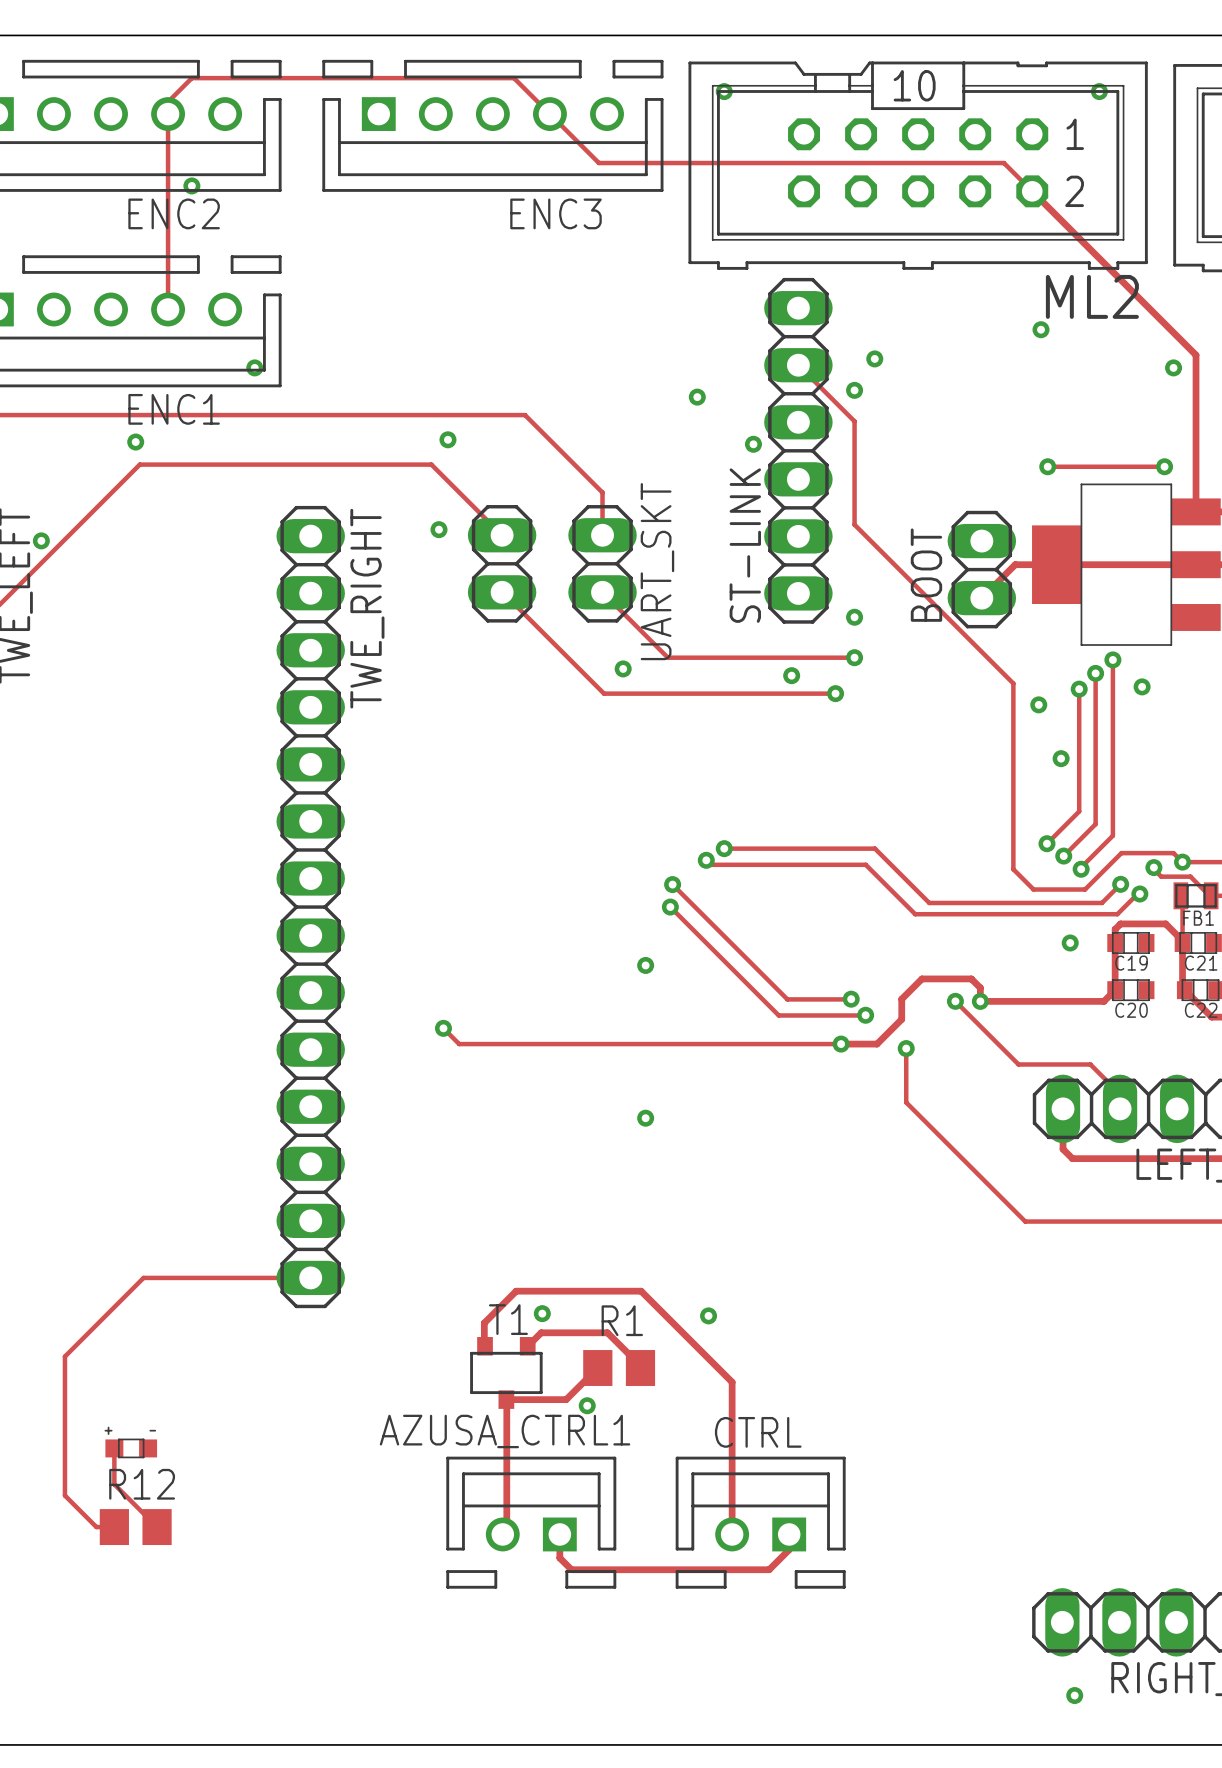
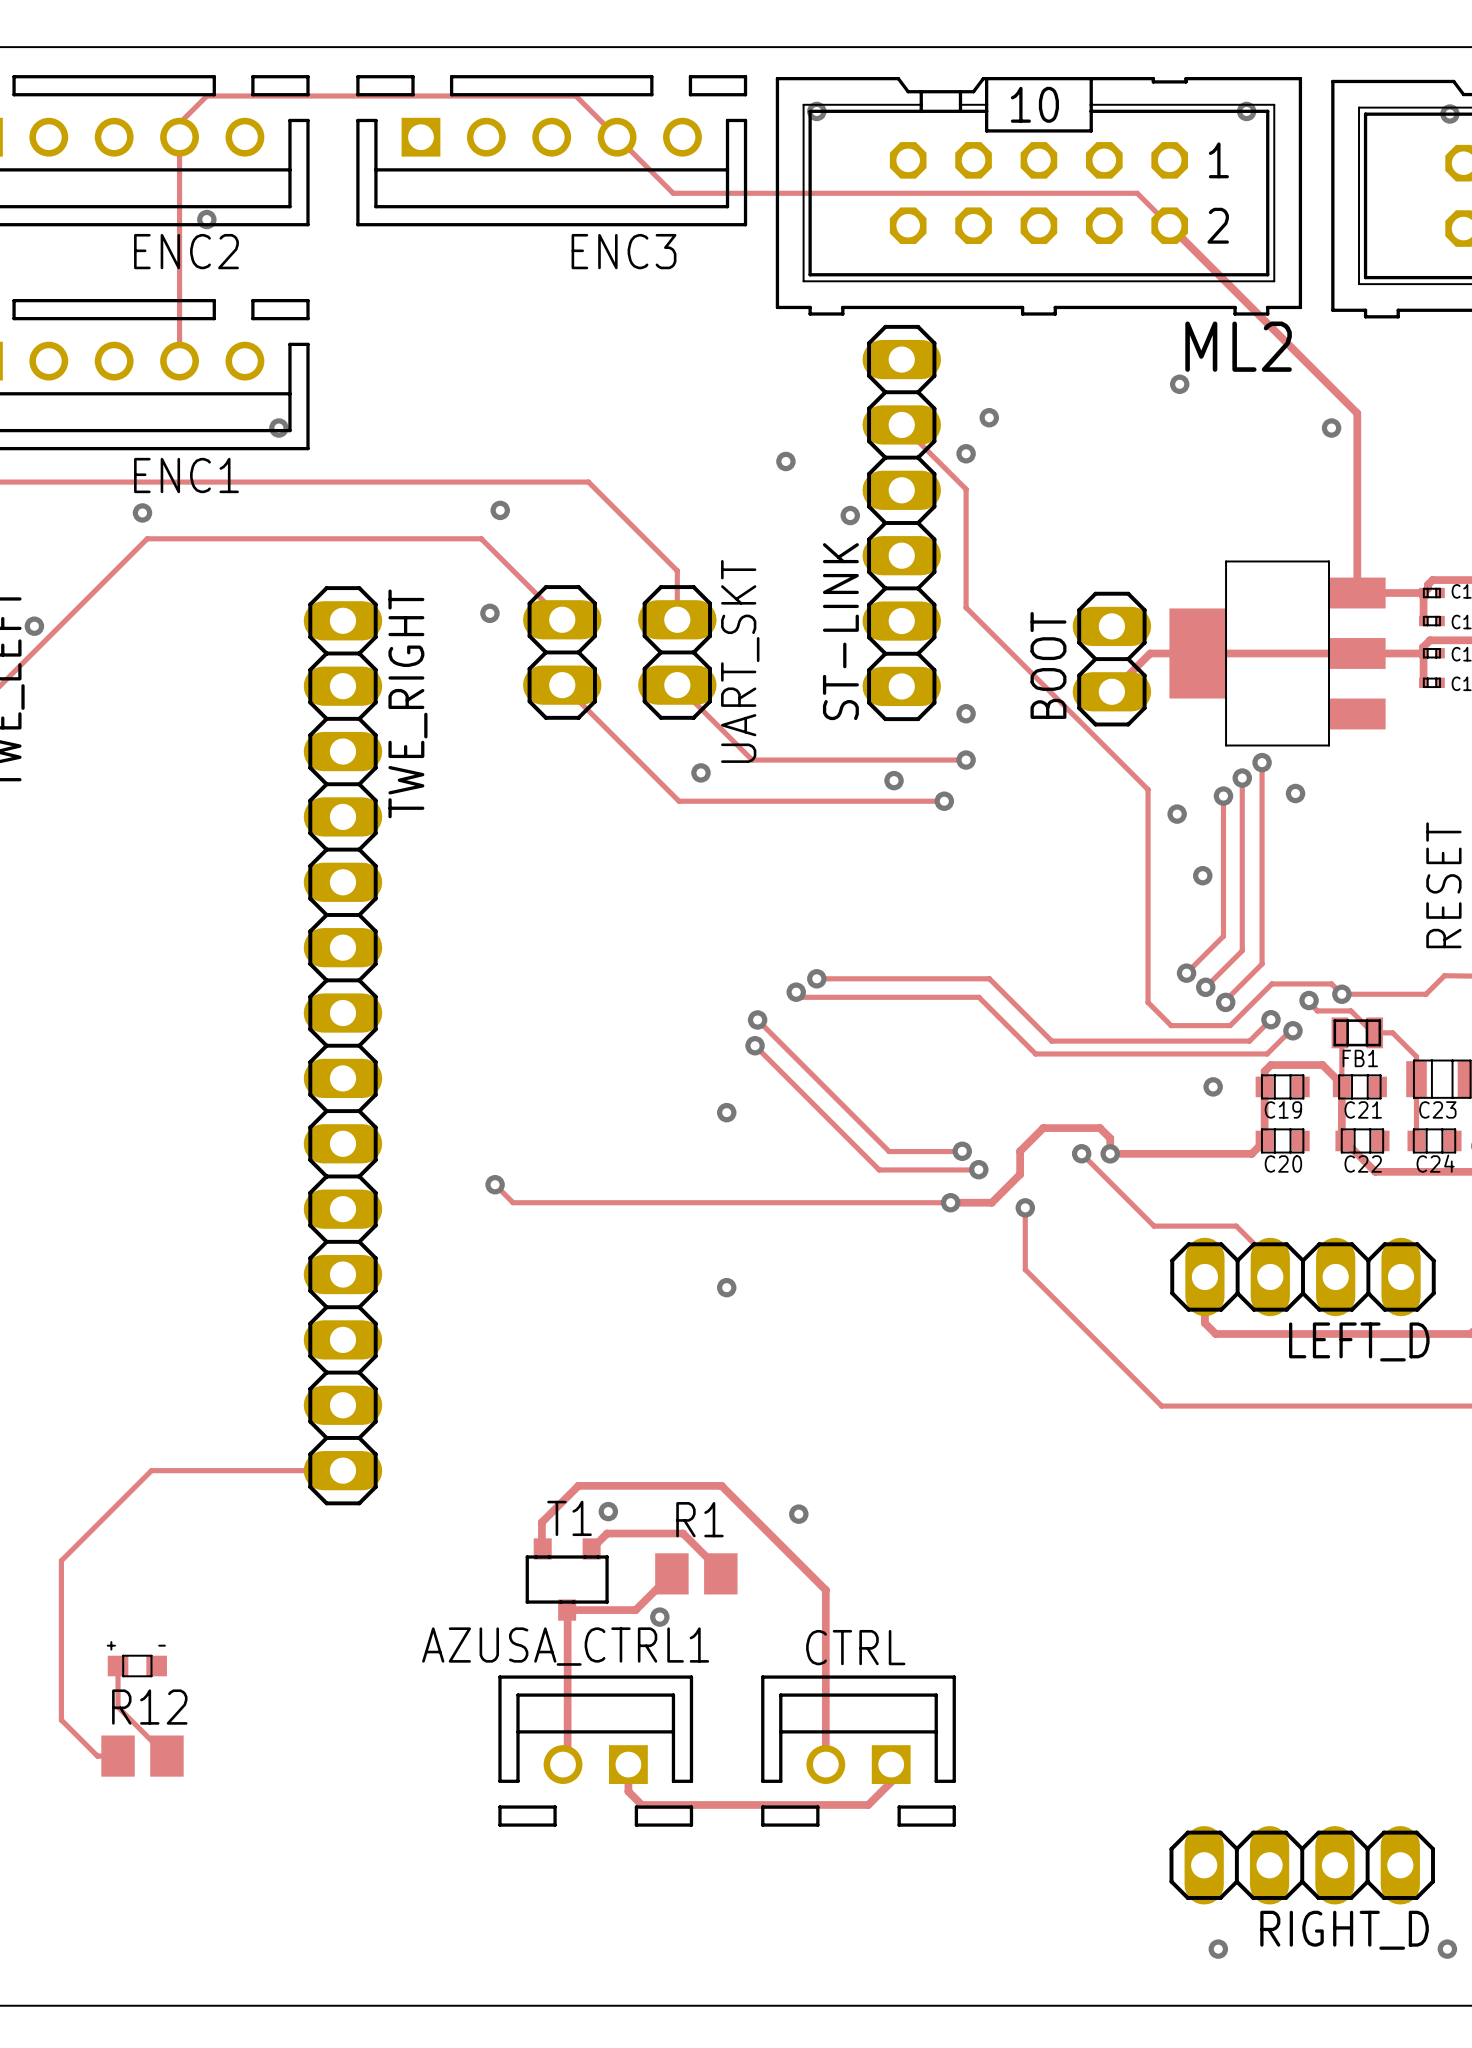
track: (1047, 466) (1164, 466) -> none
via: (1047, 466) -> none
via: (1164, 466) -> none

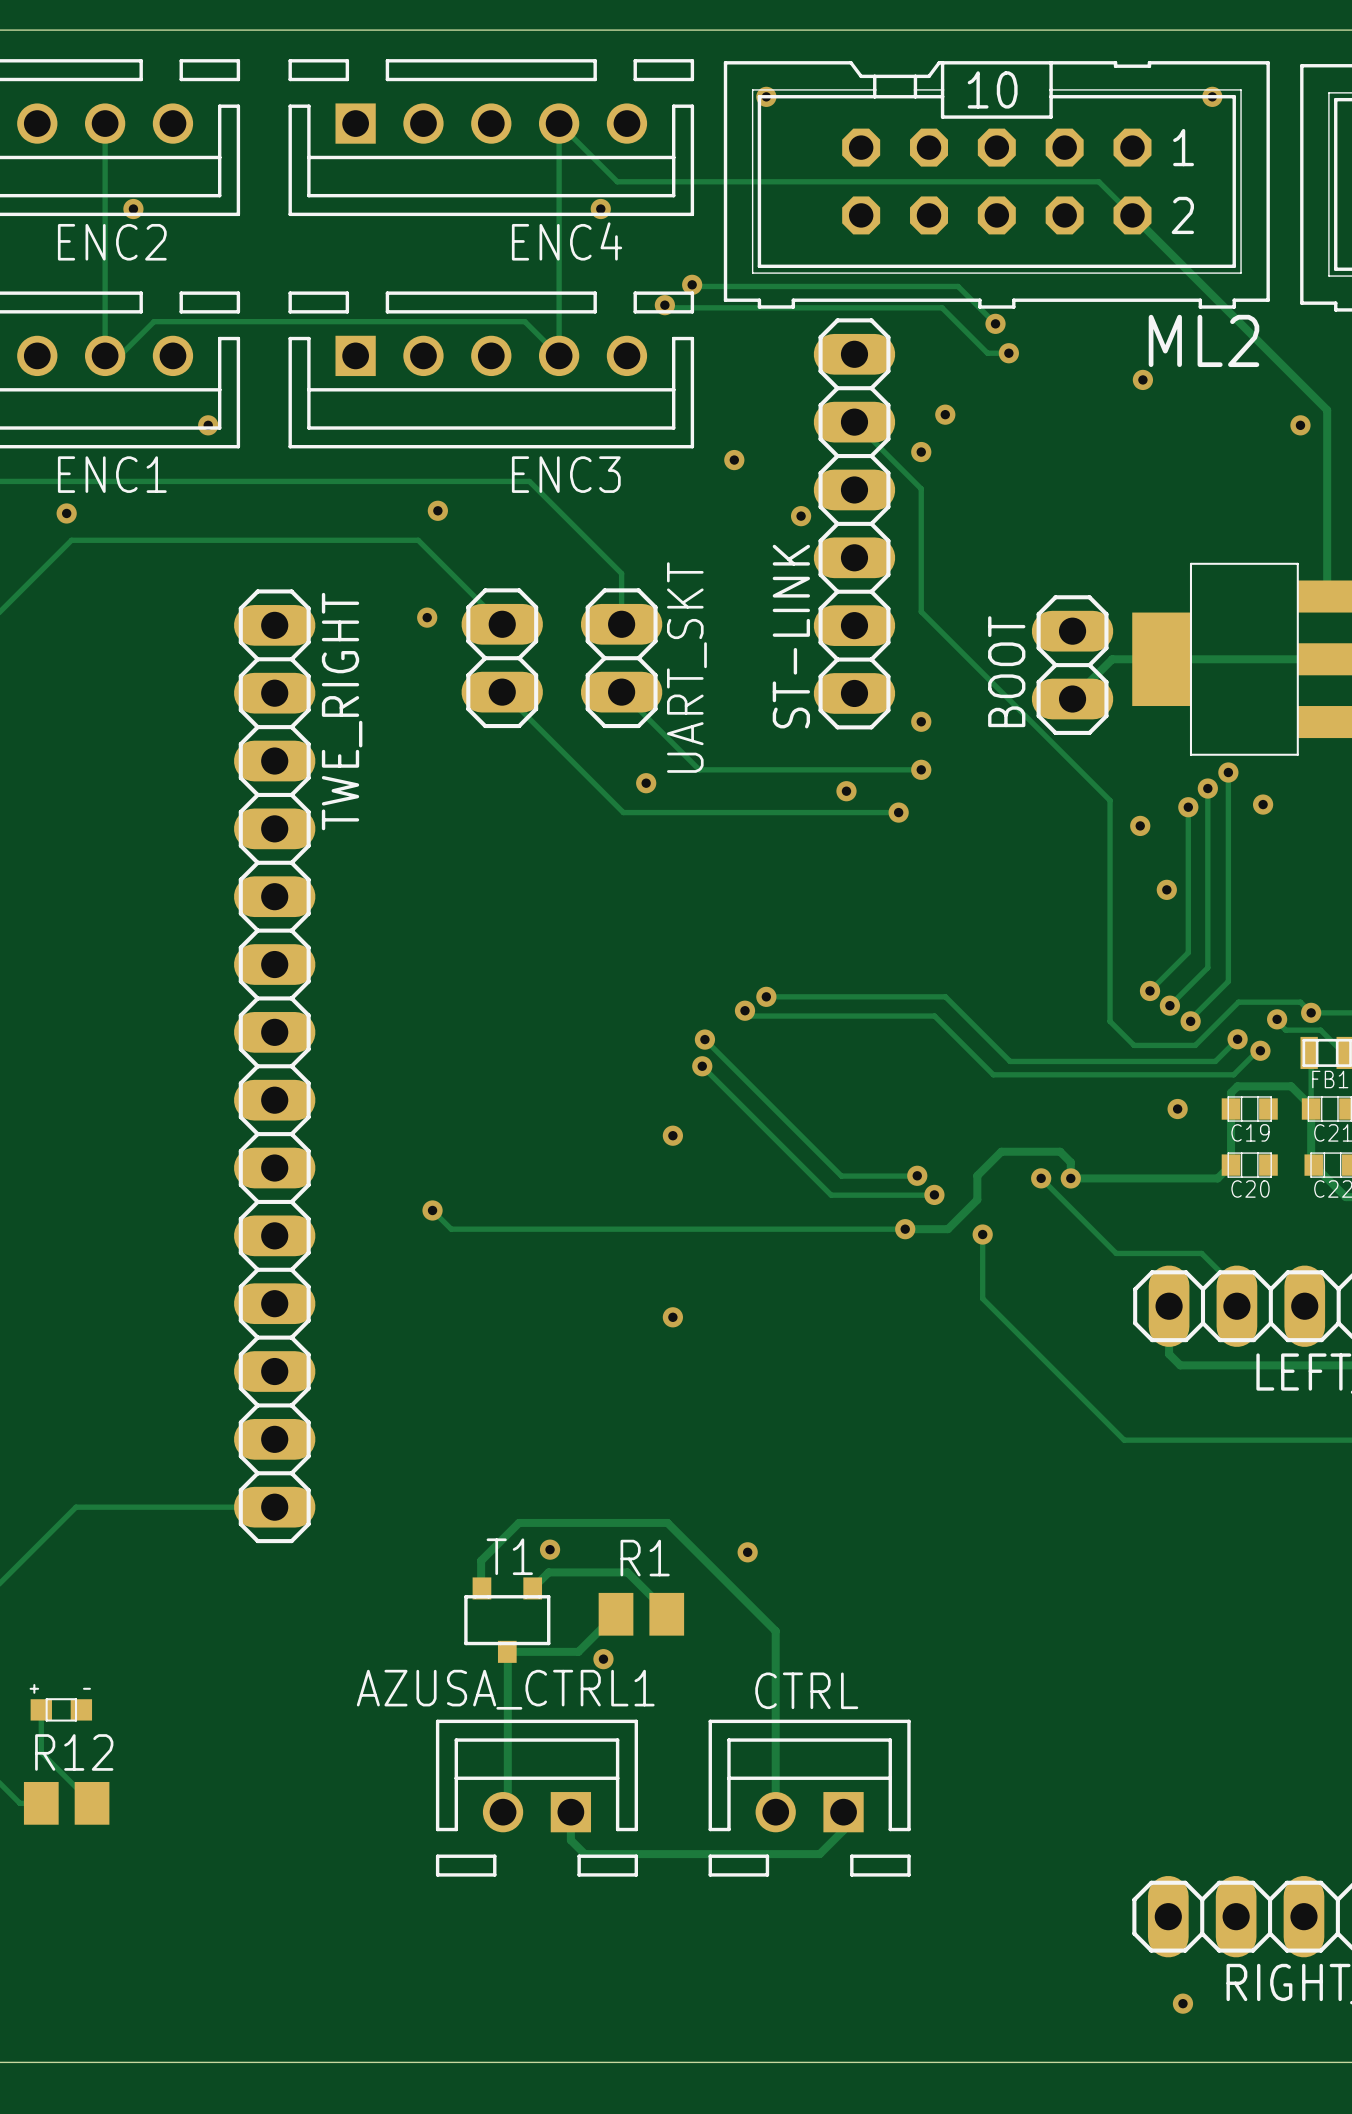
track: (179, 137) (179, 123) (206, 96) (575, 96) (617, 137) -> (105, 355) (119, 355) (154, 321) (524, 321) (559, 355) (559, 123)
via: none -> (600, 209)
ENC3 name: ENC3 (624, 251) -> ENC4 (567, 241)
track: none -> (692, 284) (693, 286) (958, 286) (995, 323)
via: none -> (692, 284)
track: none -> (664, 305) (667, 307) (942, 307) (987, 353) (1008, 353)
via: none -> (664, 305)
via: none -> (995, 323)
via: none -> (1008, 353)
ENC3: none -> (491, 369)

